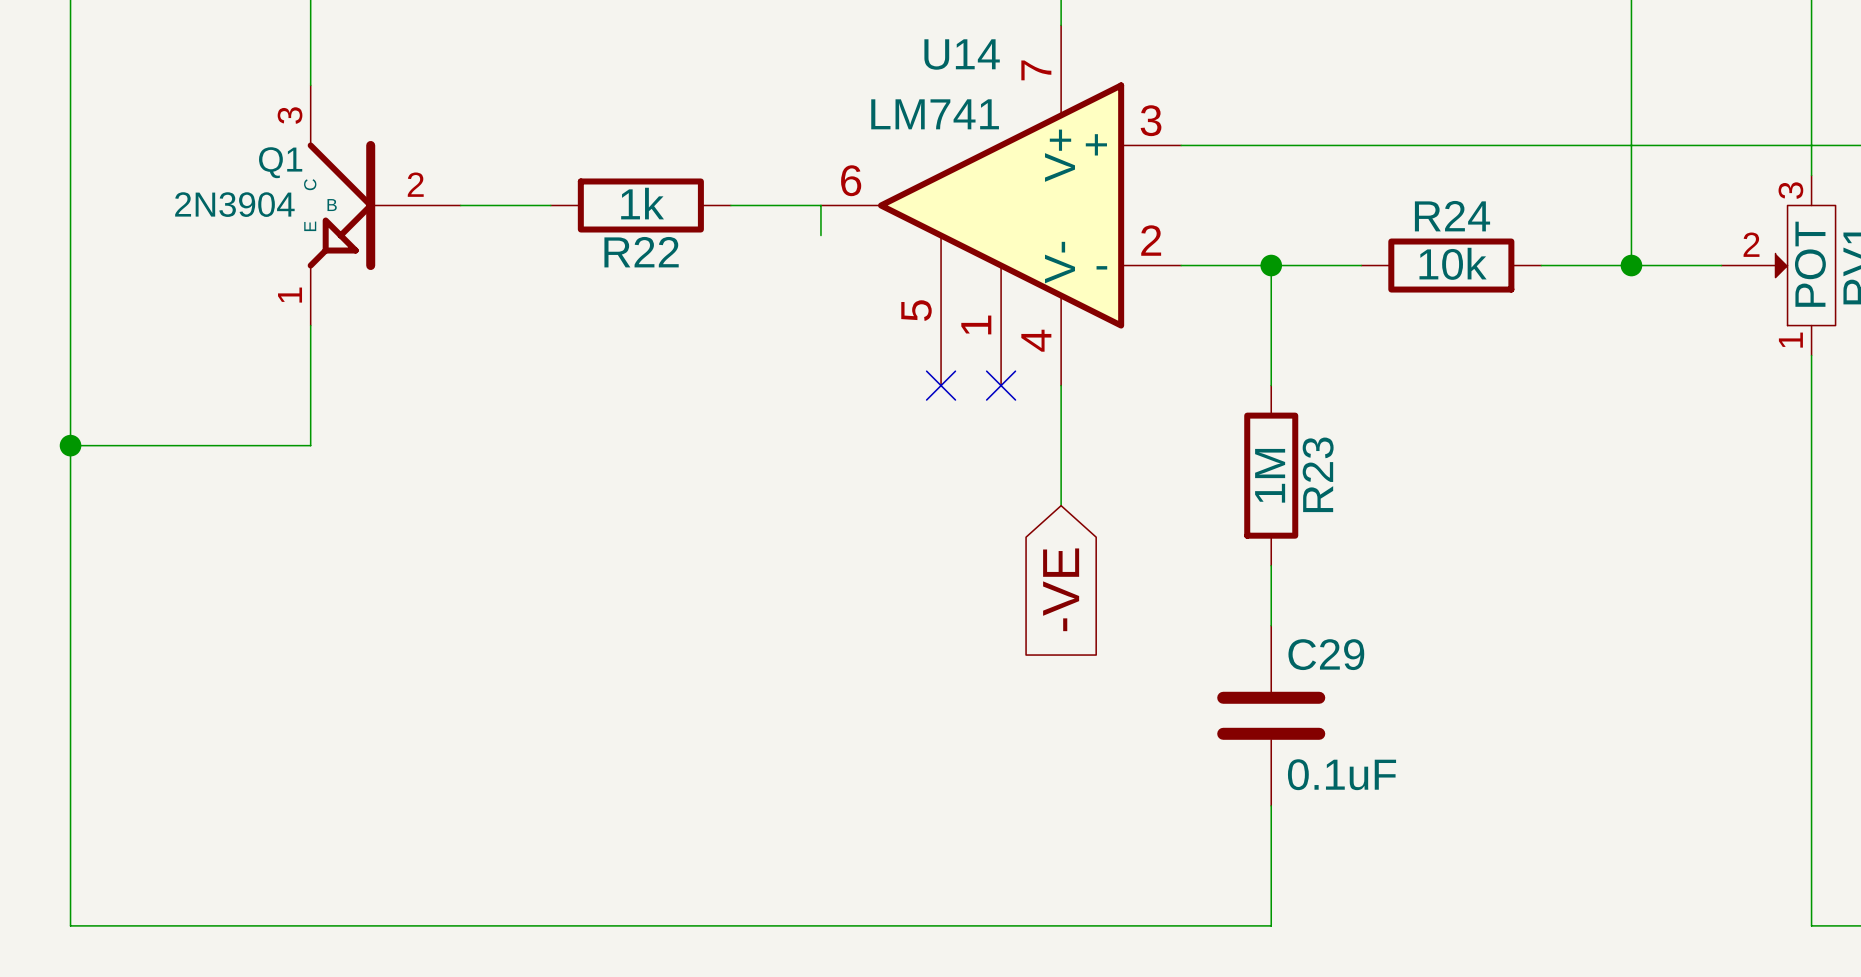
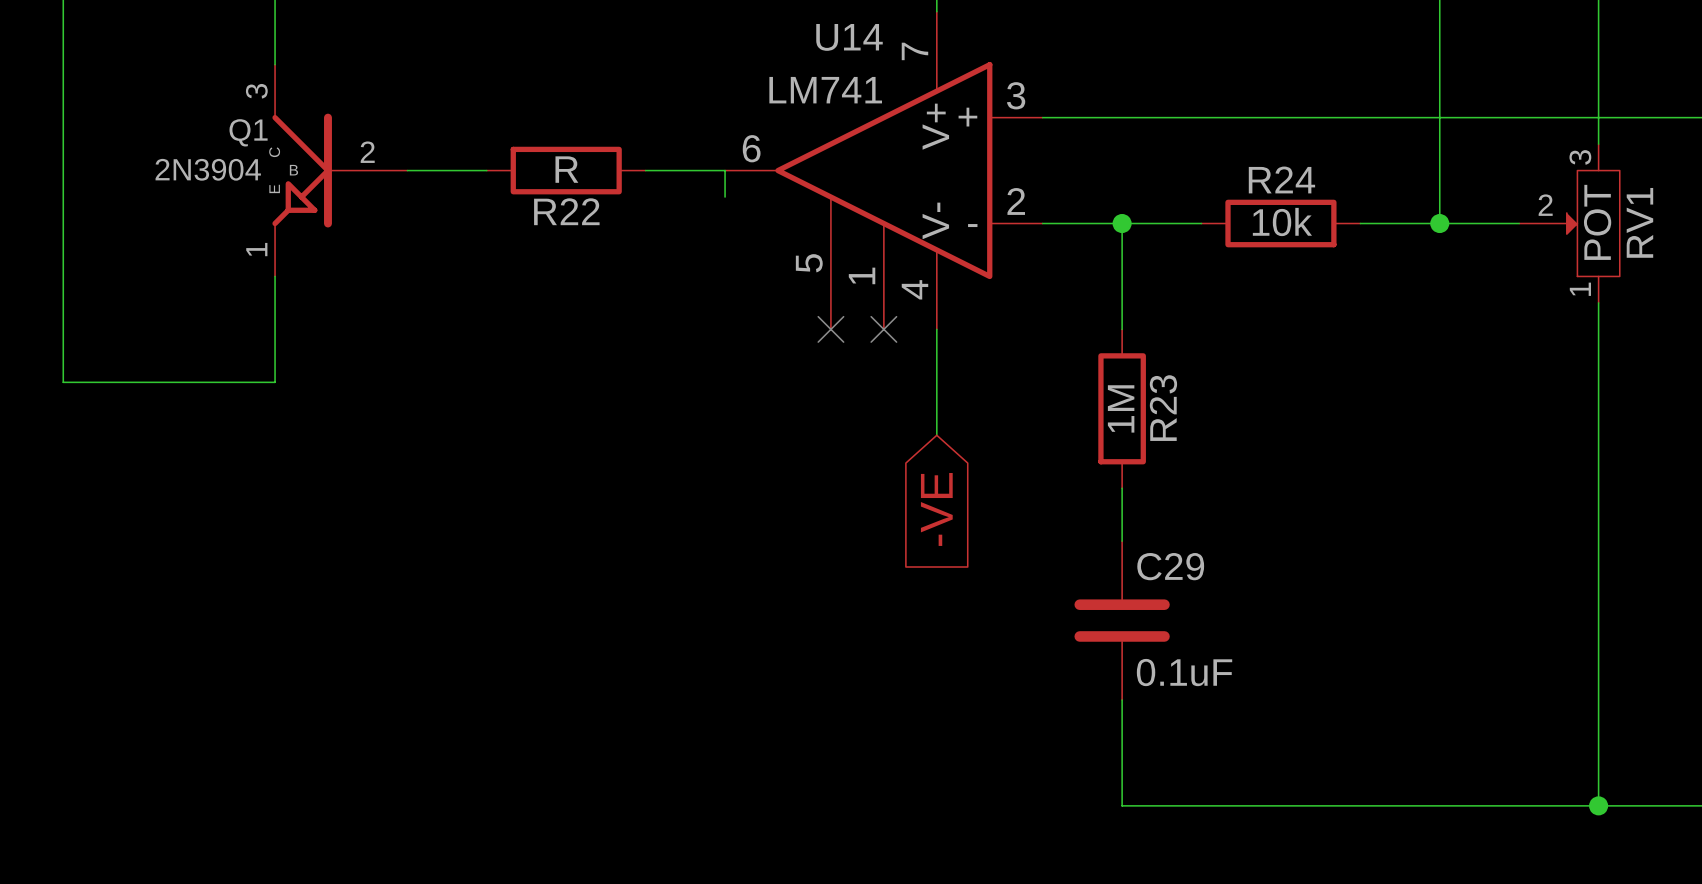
R22 value: 1k (642, 203) -> R (566, 169)
wire: (70, 445) (70, 925) (1271, 925) -> (1598, 805) (1122, 805)
junction: (70, 445) -> none
junction: none -> (1598, 805)

